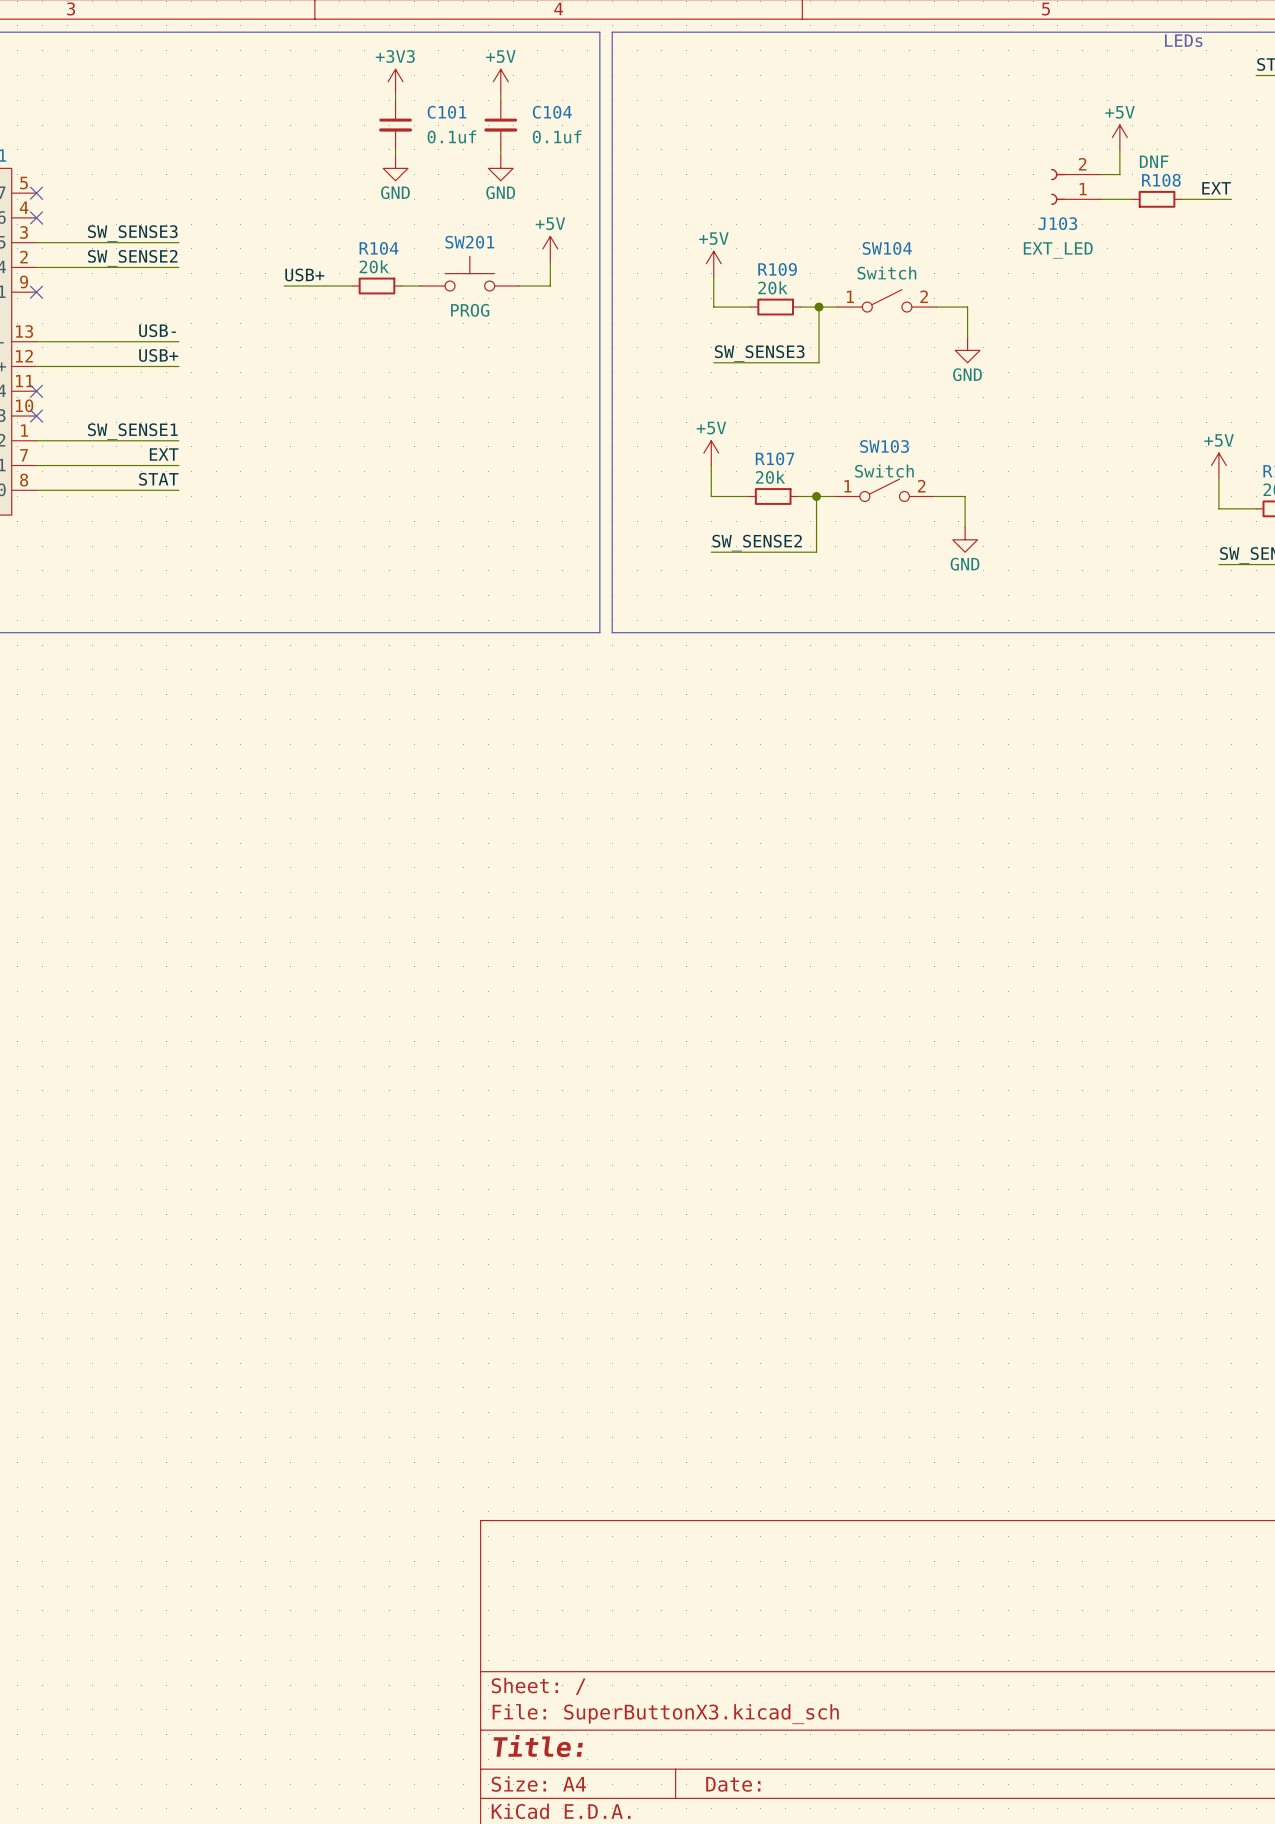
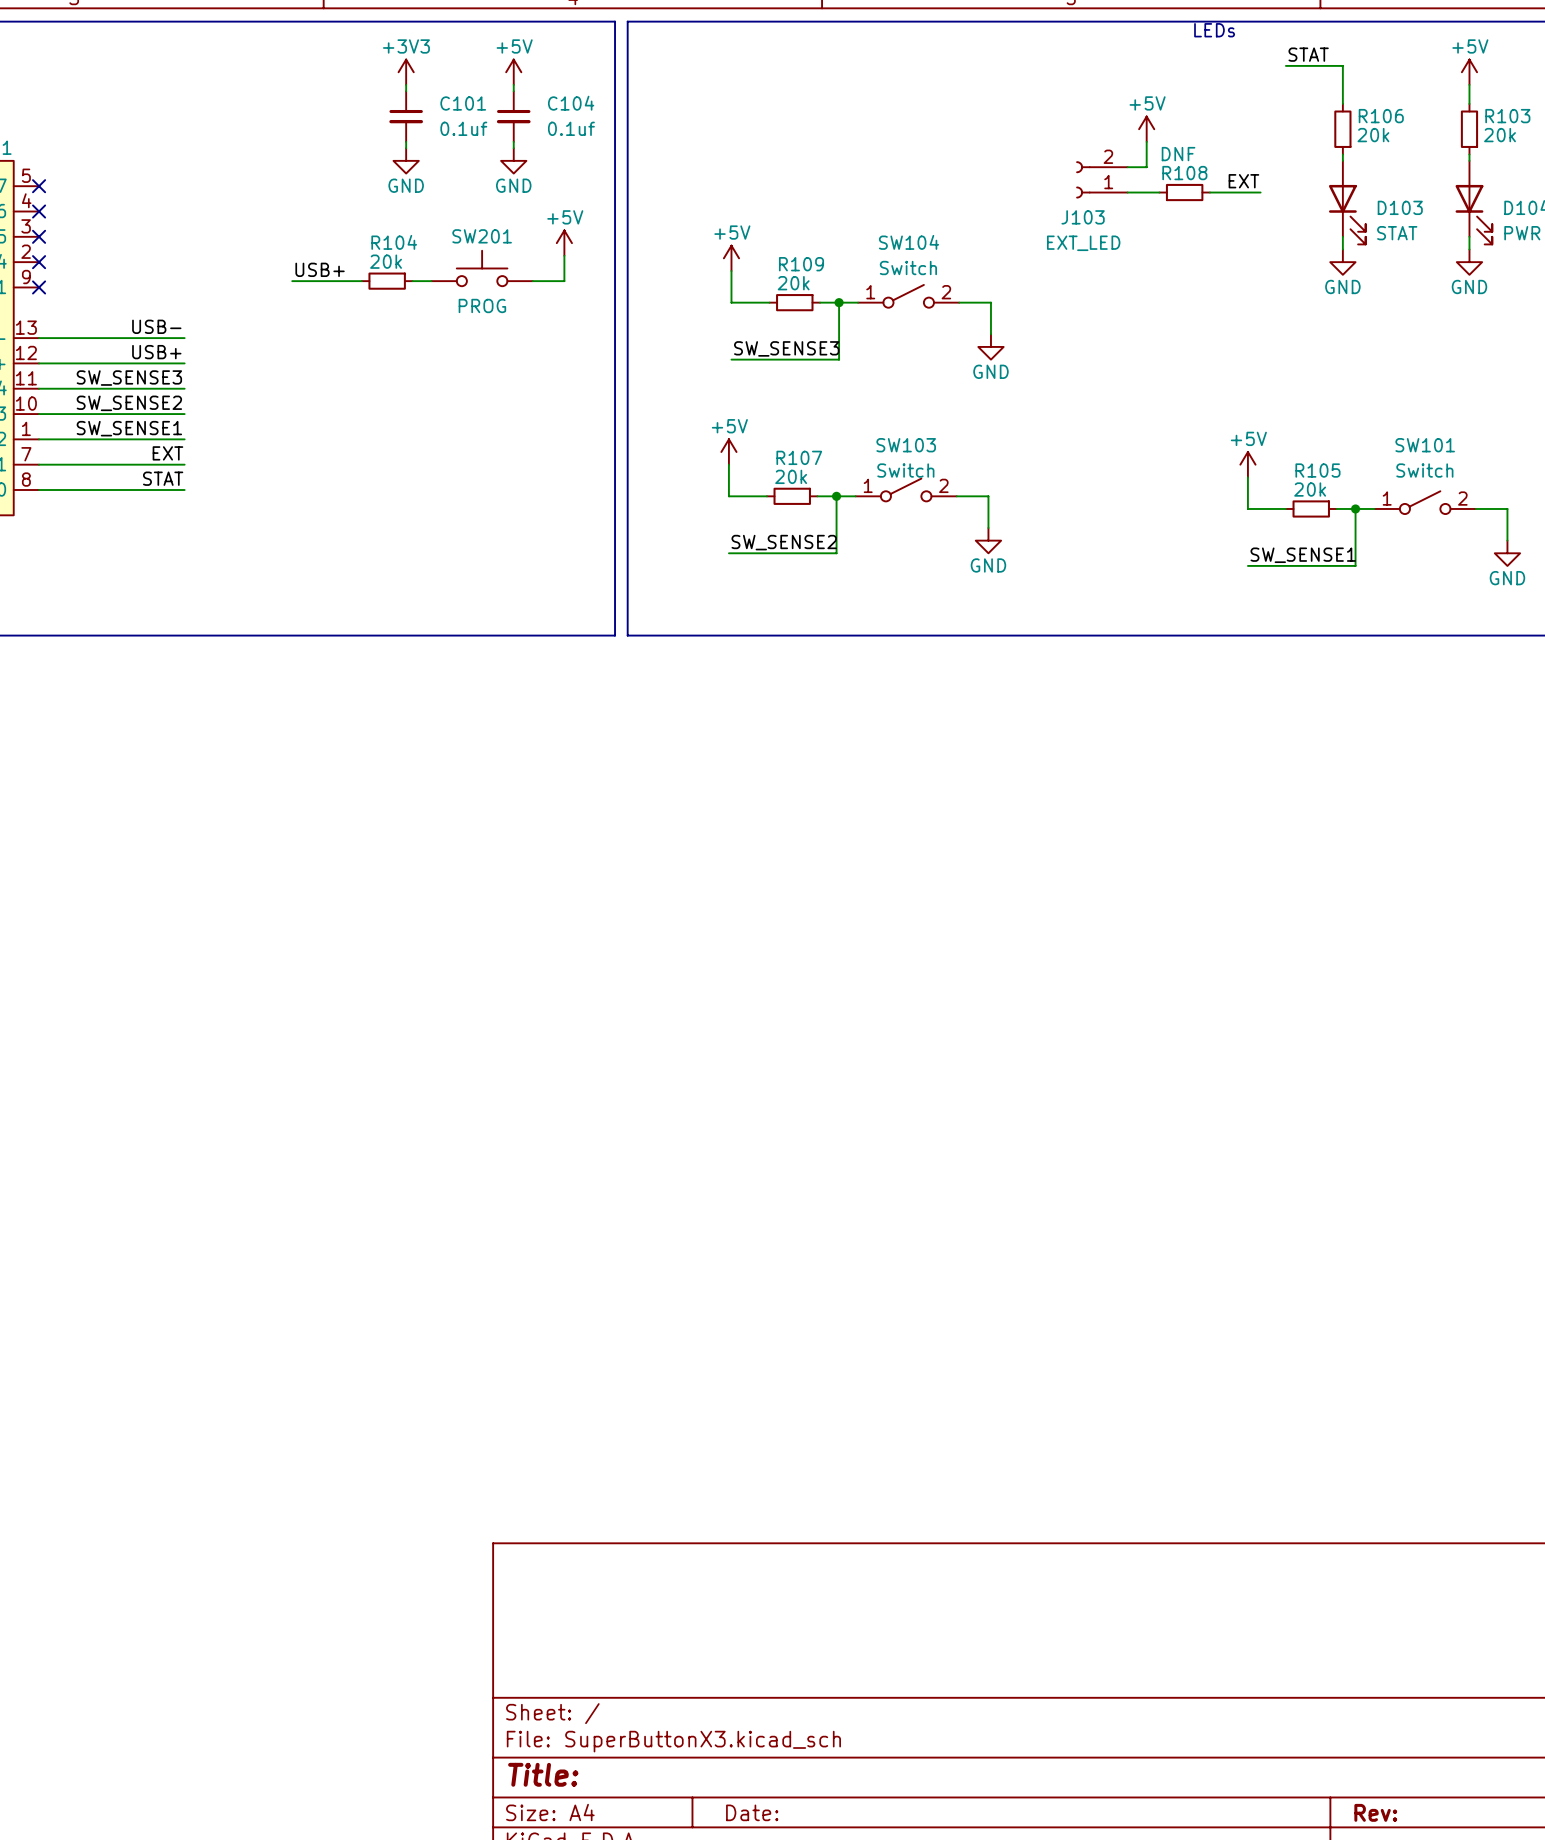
label position: SW_SENSE3 (132, 233) -> SW_SENSE3 (129, 378)
wire: (36, 242) (178, 242) -> (39, 414) (184, 414)
no-connect mark: none -> (39, 236)
label position: SW_SENSE2 (132, 258) -> SW_SENSE2 (129, 403)
wire: (36, 267) (178, 267) -> (39, 388) (184, 388)
no-connect mark: none -> (39, 262)
no-connect mark: (36, 391) -> none
no-connect mark: (36, 416) -> none

